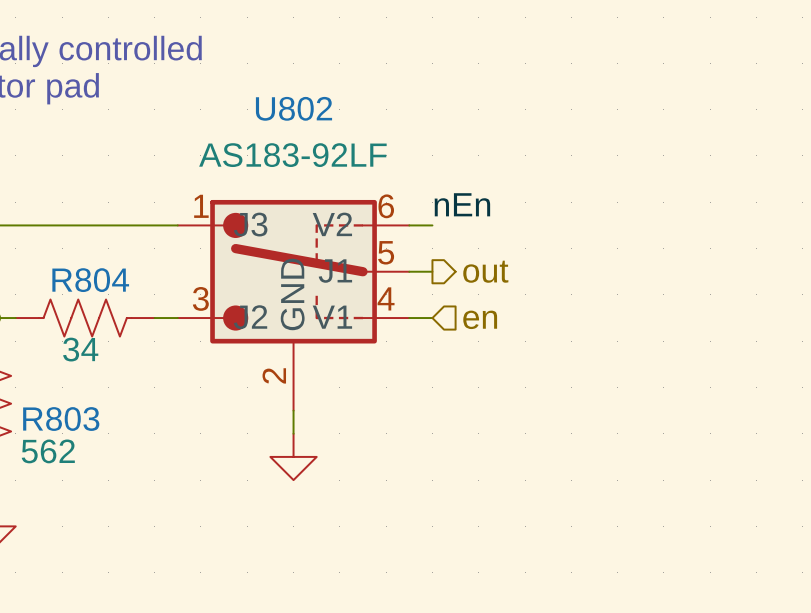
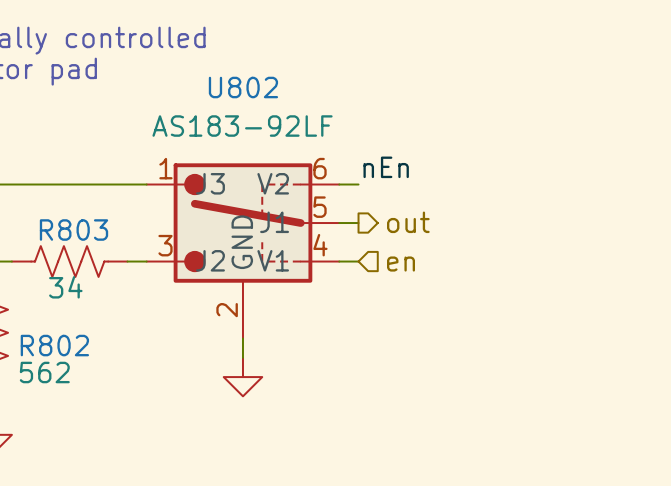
R804 name: R804 (90, 280) -> R803 (73, 230)
R803 name: R803 (61, 419) -> R802 (54, 345)

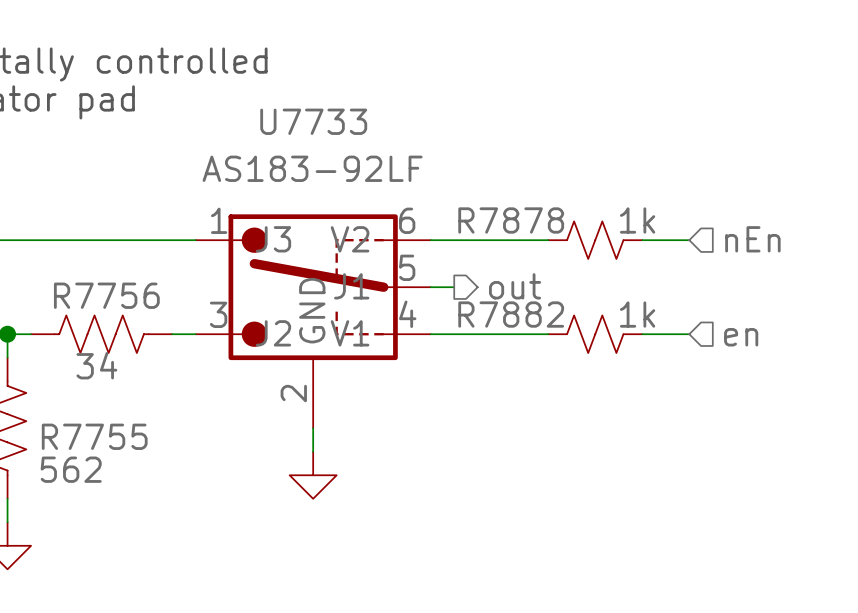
U802 name: U802 (243, 87) -> U7733 (313, 121)
label: nEn (386, 167) -> none
hierarchical label: none -> nEn (752, 239)
wire: none -> (454, 240) (548, 240)
R7878: none -> 1k (595, 240)
wire: none -> (642, 240) (689, 240)
R803 name: R803 (73, 230) -> R7756 (106, 295)
wire: none -> (454, 334) (548, 334)
R7882: none -> 1k (595, 334)
wire: none -> (642, 334) (689, 334)
hierarchical label position: en (401, 264) -> en (741, 337)
R802 name: R802 (54, 345) -> R7755 (94, 436)

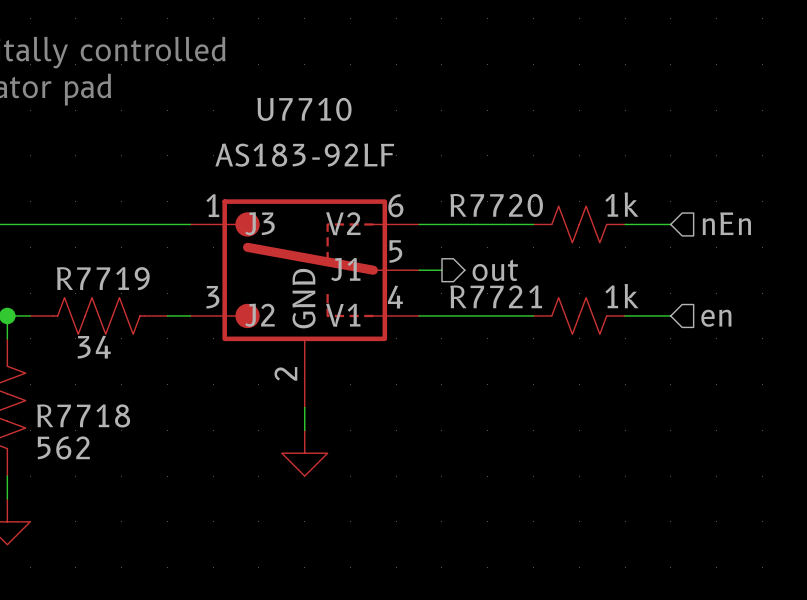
U7733 name: U7733 (313, 121) -> U7710 (304, 109)
R7878 name: R7878 (511, 220) -> R7720 (496, 205)
R7756 name: R7756 (106, 295) -> R7719 (103, 278)
R7882 name: R7882 (511, 314) -> R7721 (496, 296)
R7755 name: R7755 (94, 436) -> R7718 (83, 415)

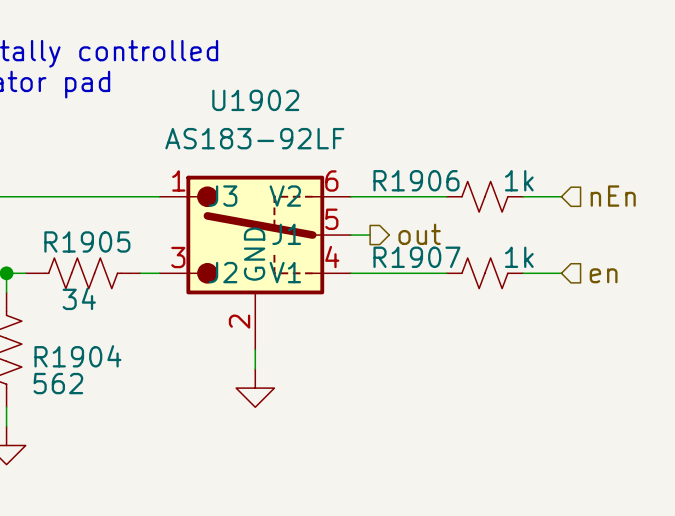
U7710 name: U7710 (304, 109) -> U1902 (255, 100)
R7720 name: R7720 (496, 205) -> R1906 (416, 180)
R7719 name: R7719 (103, 278) -> R1905 (87, 241)
R7721 name: R7721 (496, 296) -> R1907 (416, 257)
R7718 name: R7718 (83, 415) -> R1904 (77, 356)

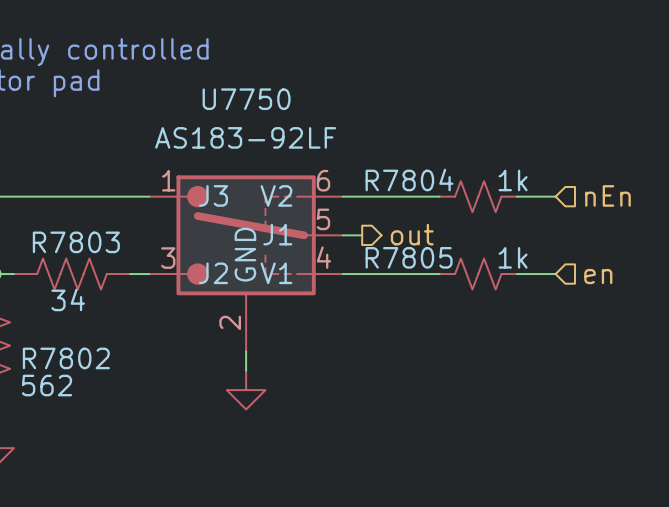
U1902 name: U1902 (255, 100) -> U7750 (246, 99)
R1906 name: R1906 (416, 180) -> R7804 (409, 179)
R1905 name: R1905 (87, 241) -> R7803 (76, 242)
R1907 name: R1907 (416, 257) -> R7805 (409, 257)
R1904 name: R1904 (77, 356) -> R7802 (66, 358)

